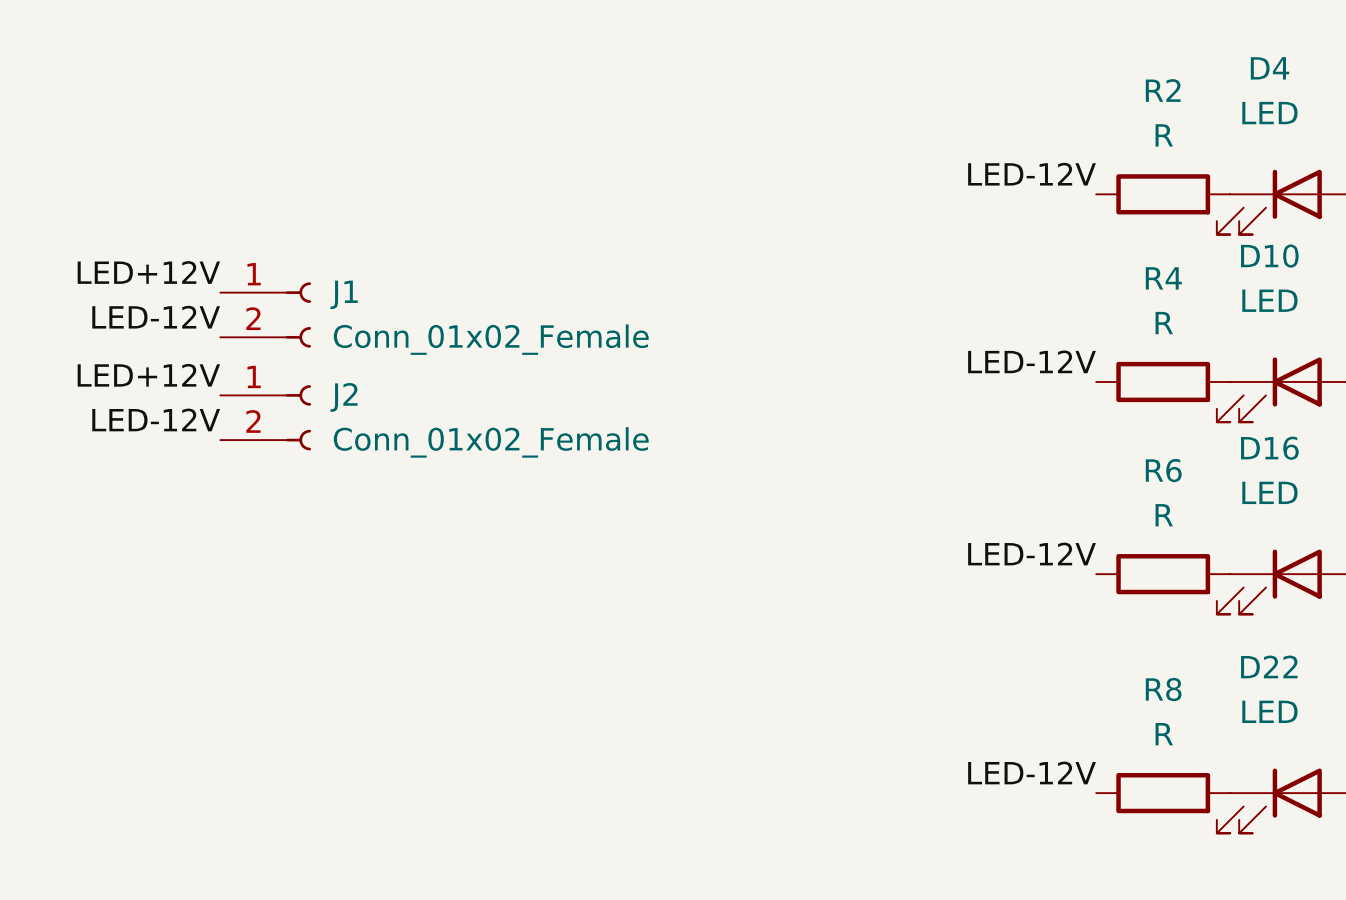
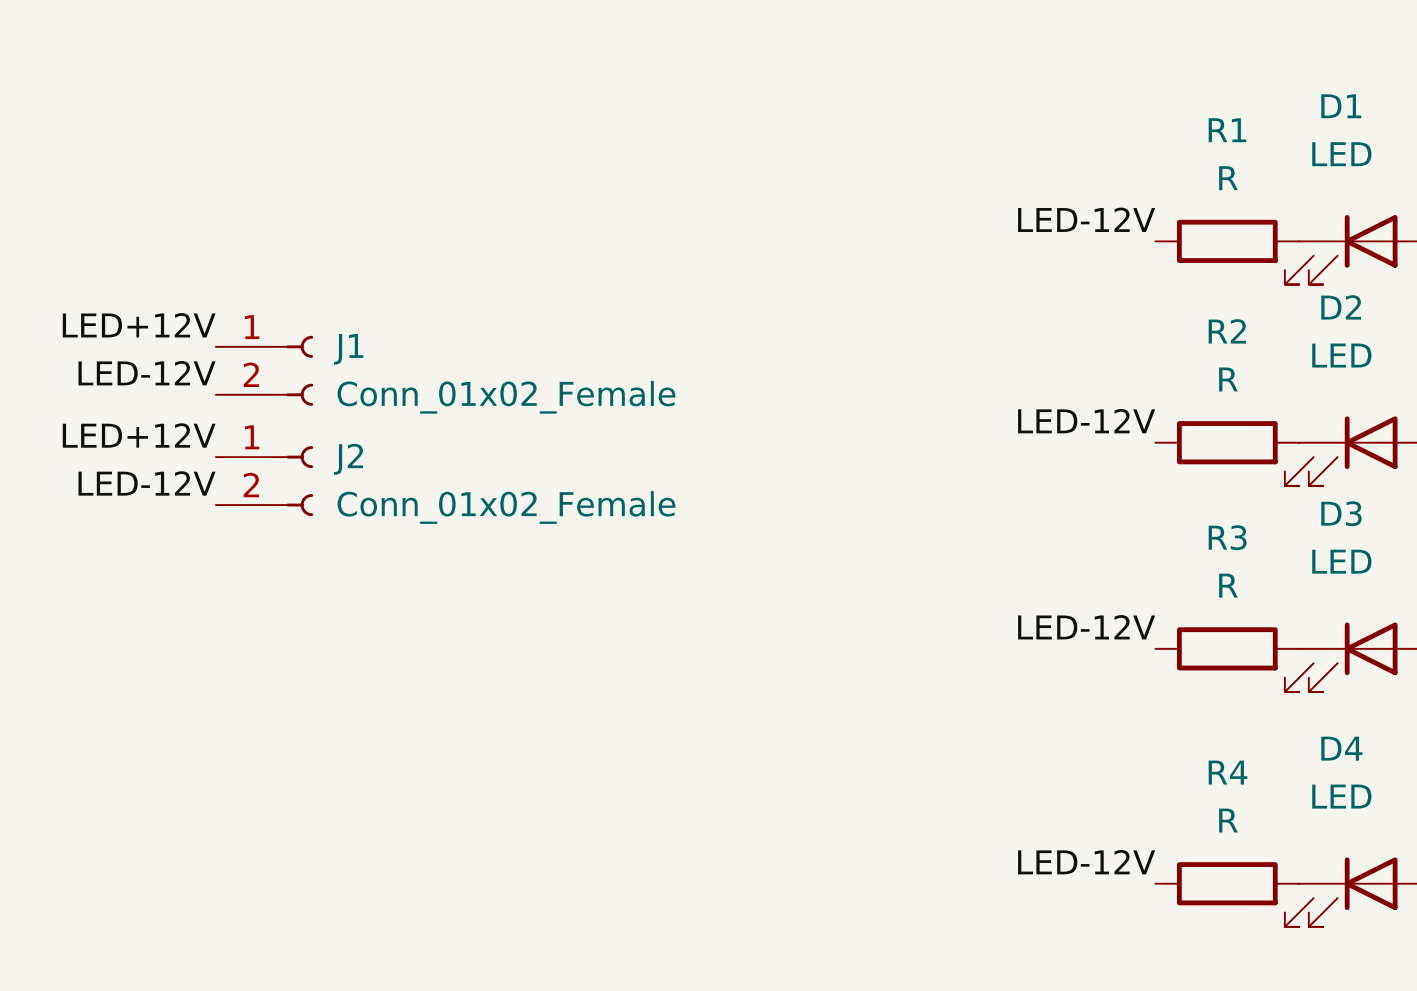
D4 name: D4 (1269, 68) -> D1 (1341, 106)
R2 name: R2 (1163, 90) -> R1 (1227, 130)
D10 name: D10 (1269, 256) -> D2 (1341, 307)
R4 name: R4 (1163, 278) -> R2 (1227, 331)
D16 name: D16 (1269, 448) -> D3 (1341, 513)
R6 name: R6 (1163, 470) -> R3 (1227, 537)
D22 name: D22 (1269, 666) -> D4 (1341, 748)
R8 name: R8 (1163, 689) -> R4 (1228, 772)

